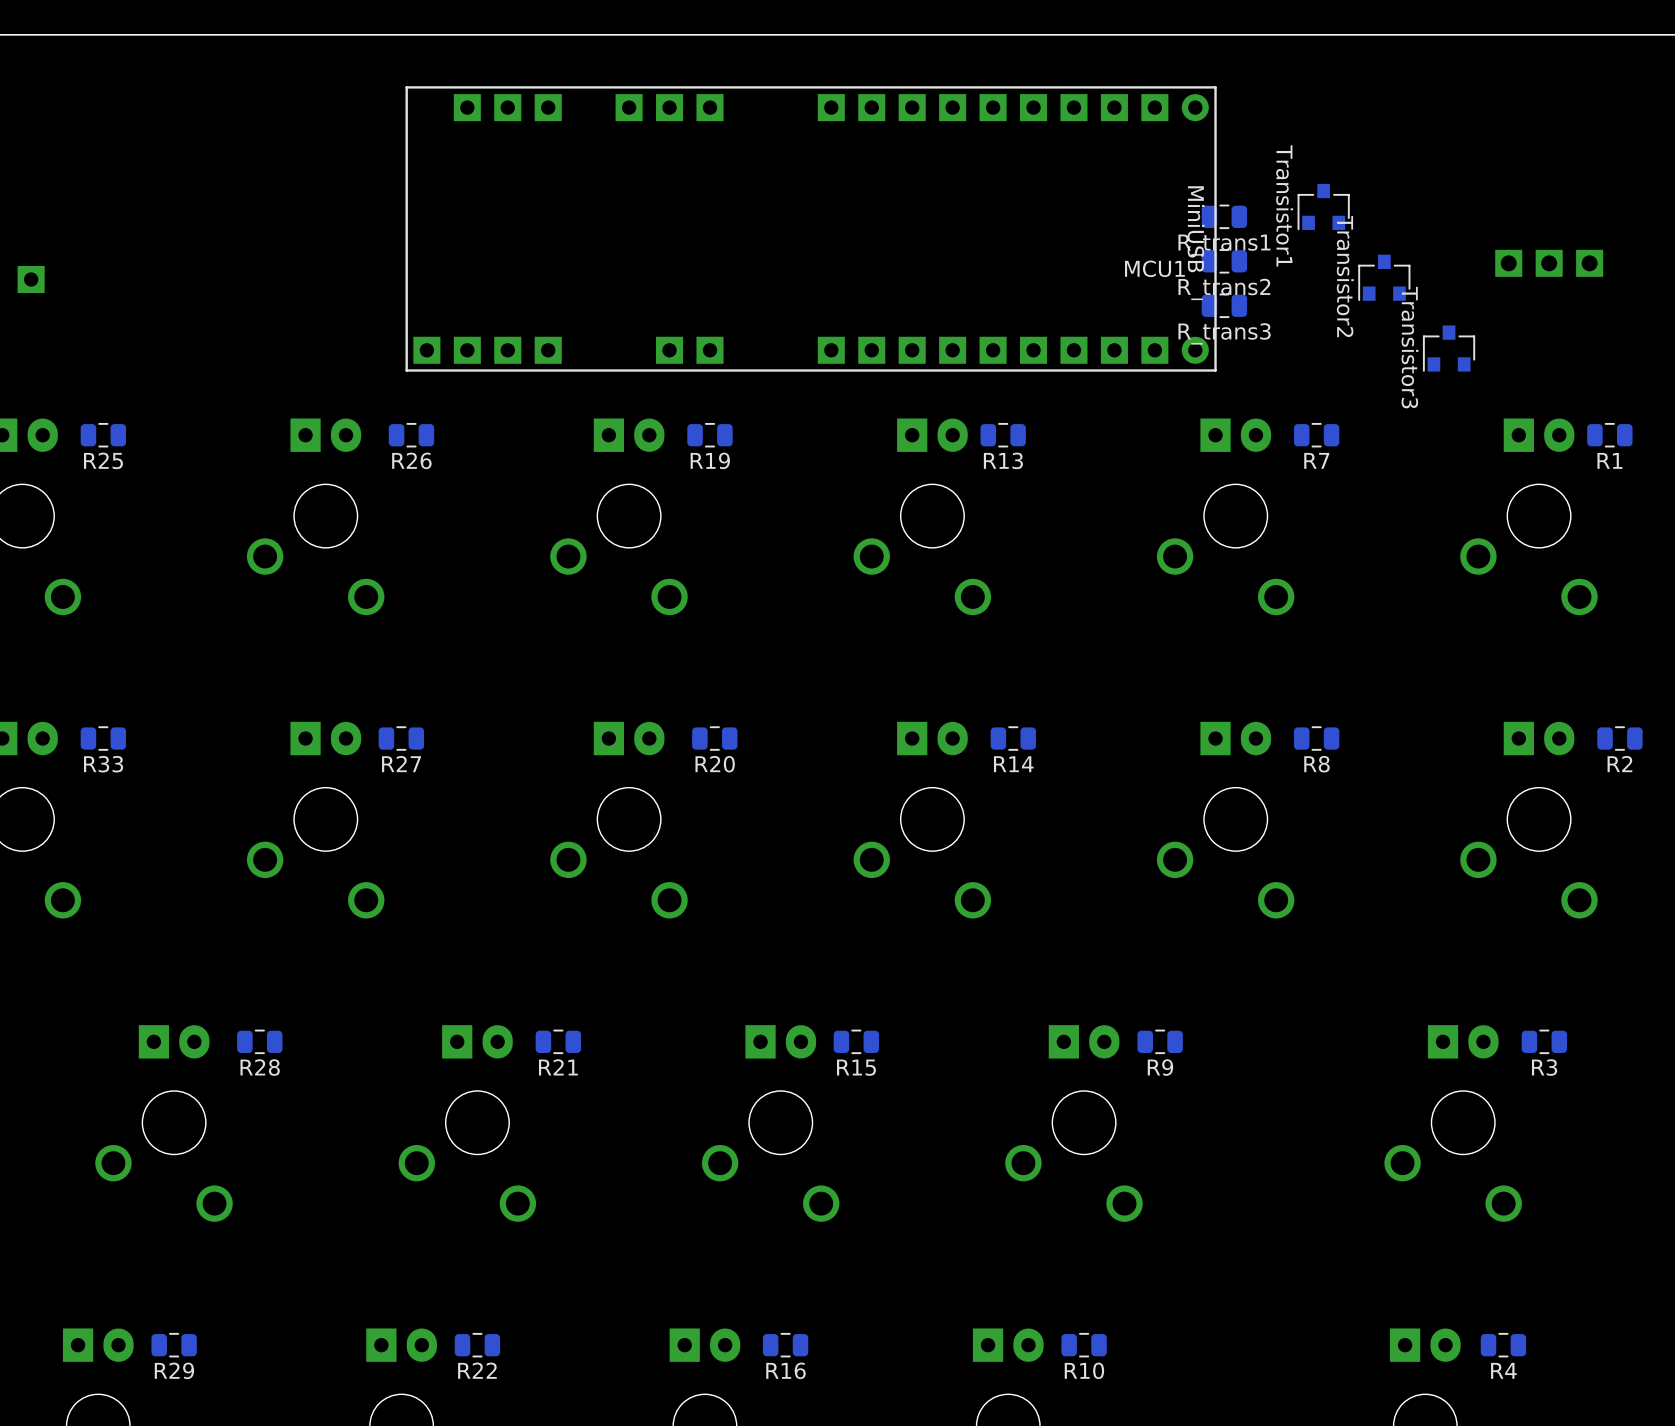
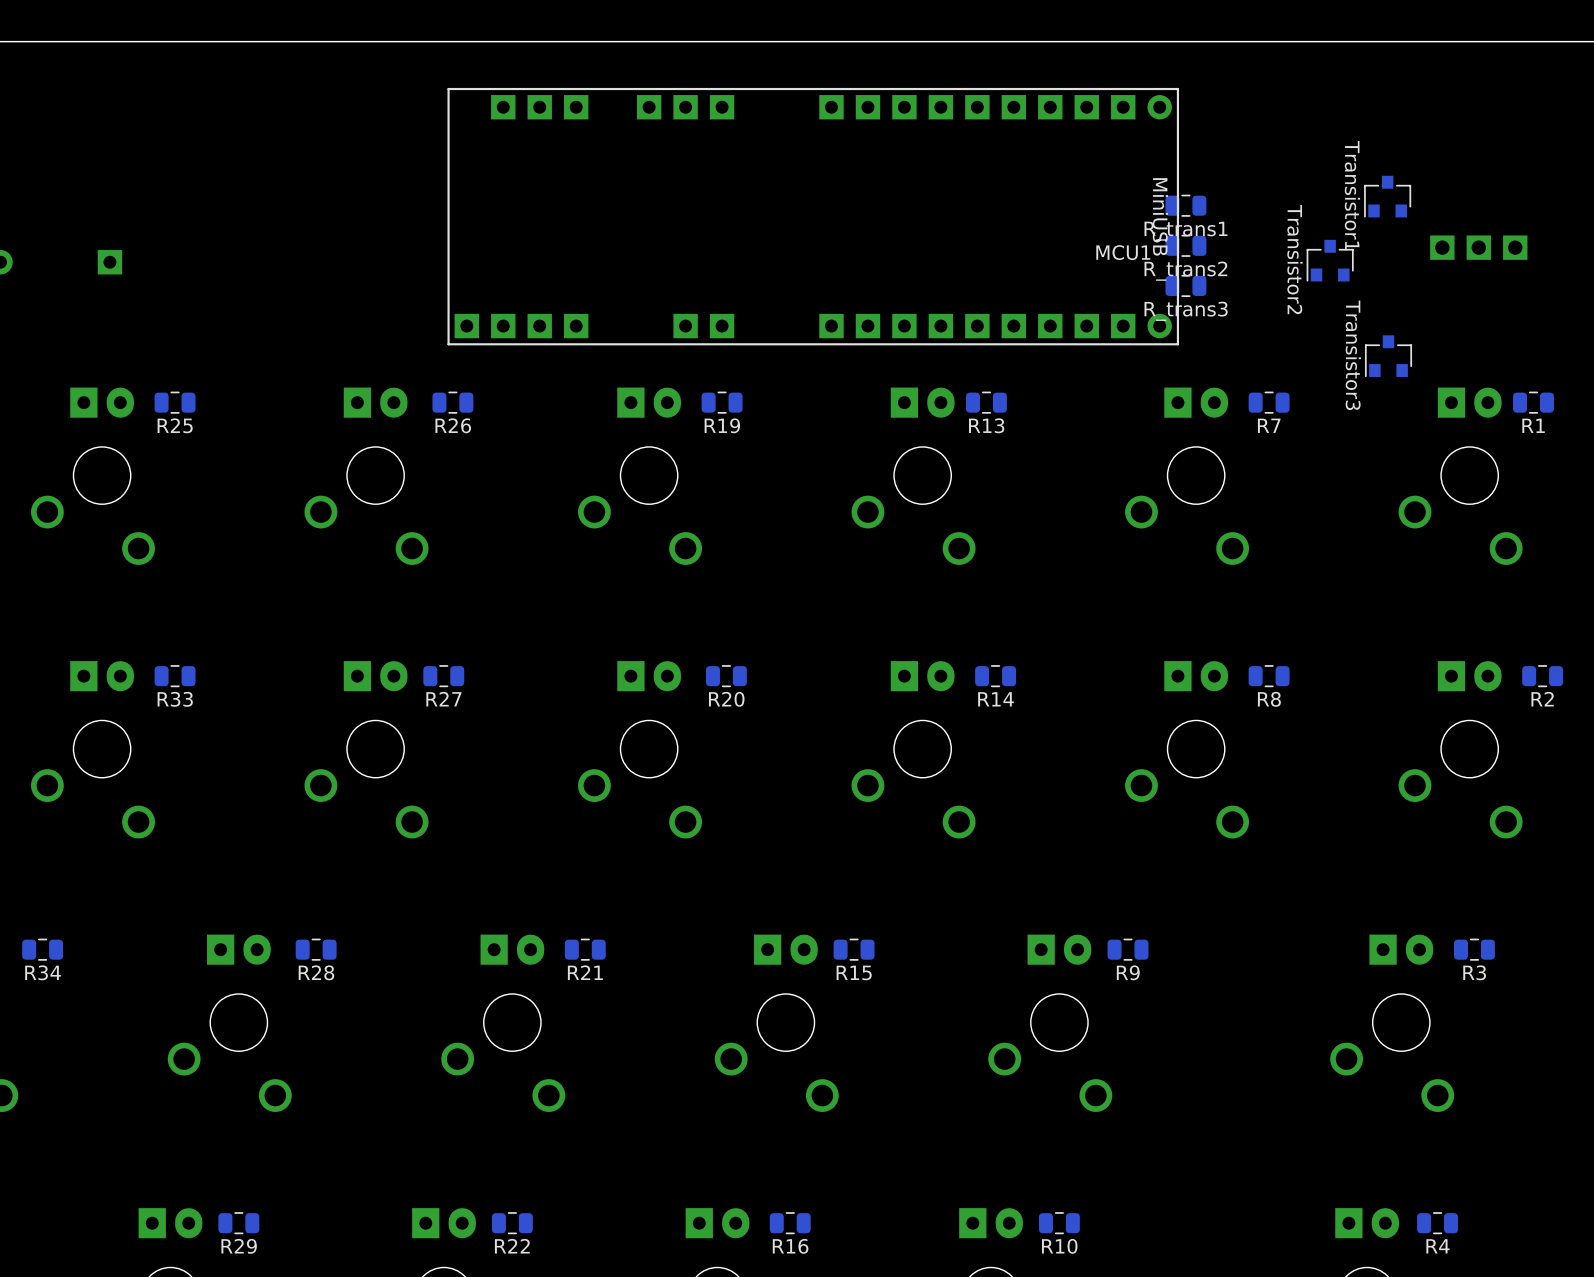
Transistor1 position: (1323, 207) -> (1387, 196)
Transistor3 position: (1449, 348) -> (1388, 356)

